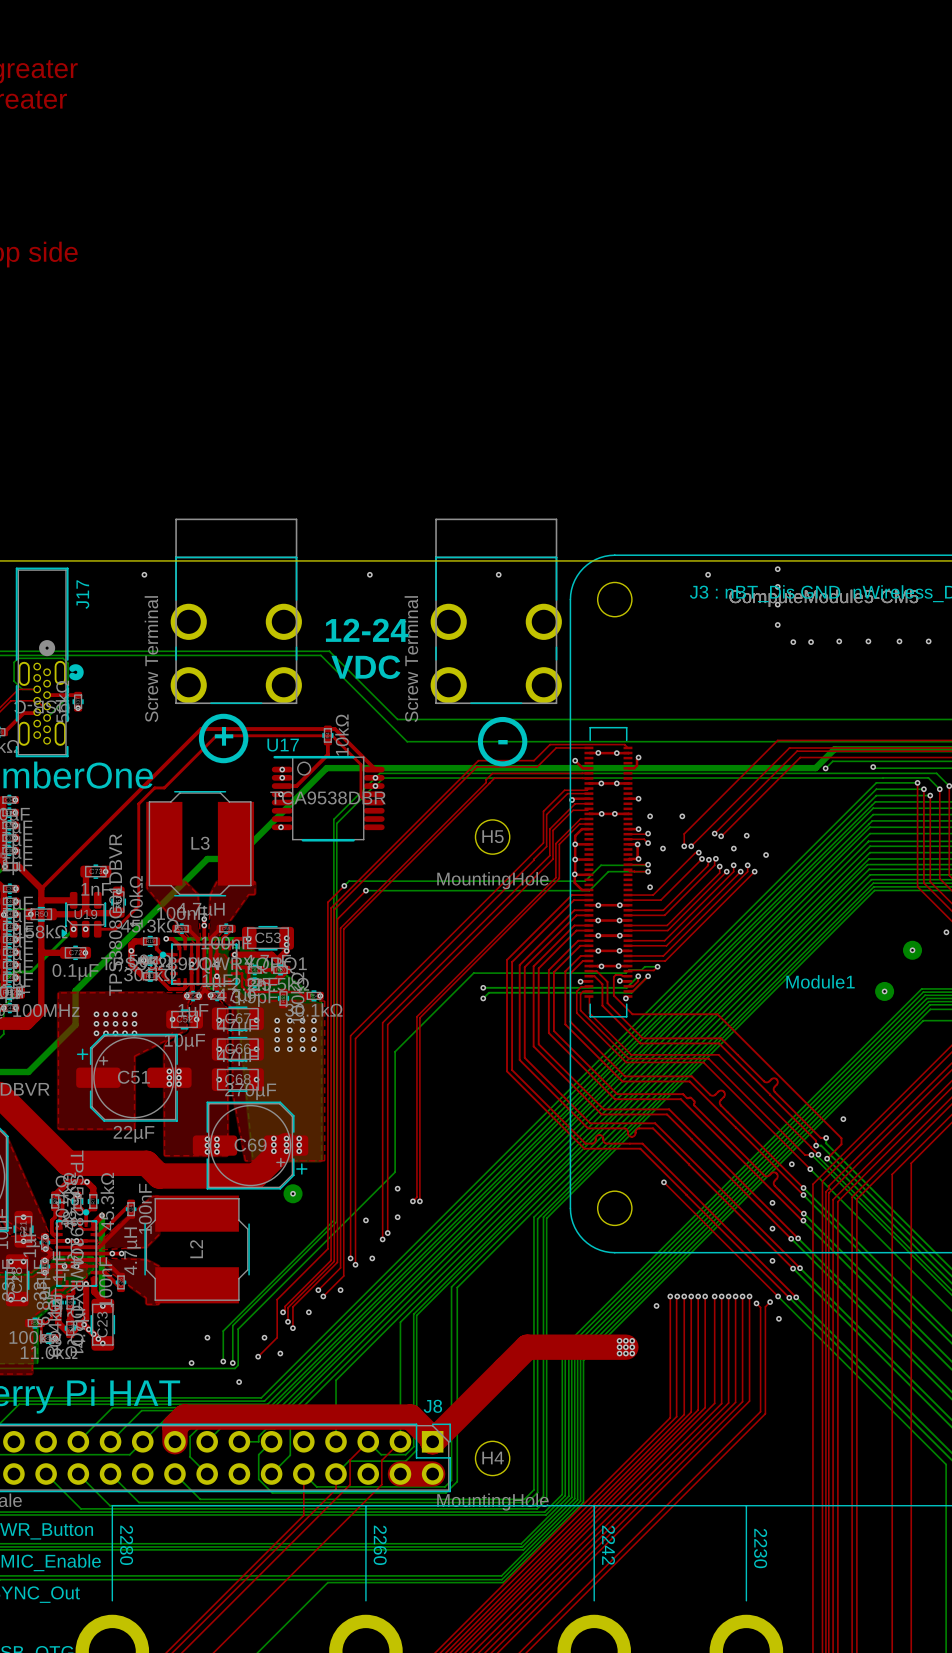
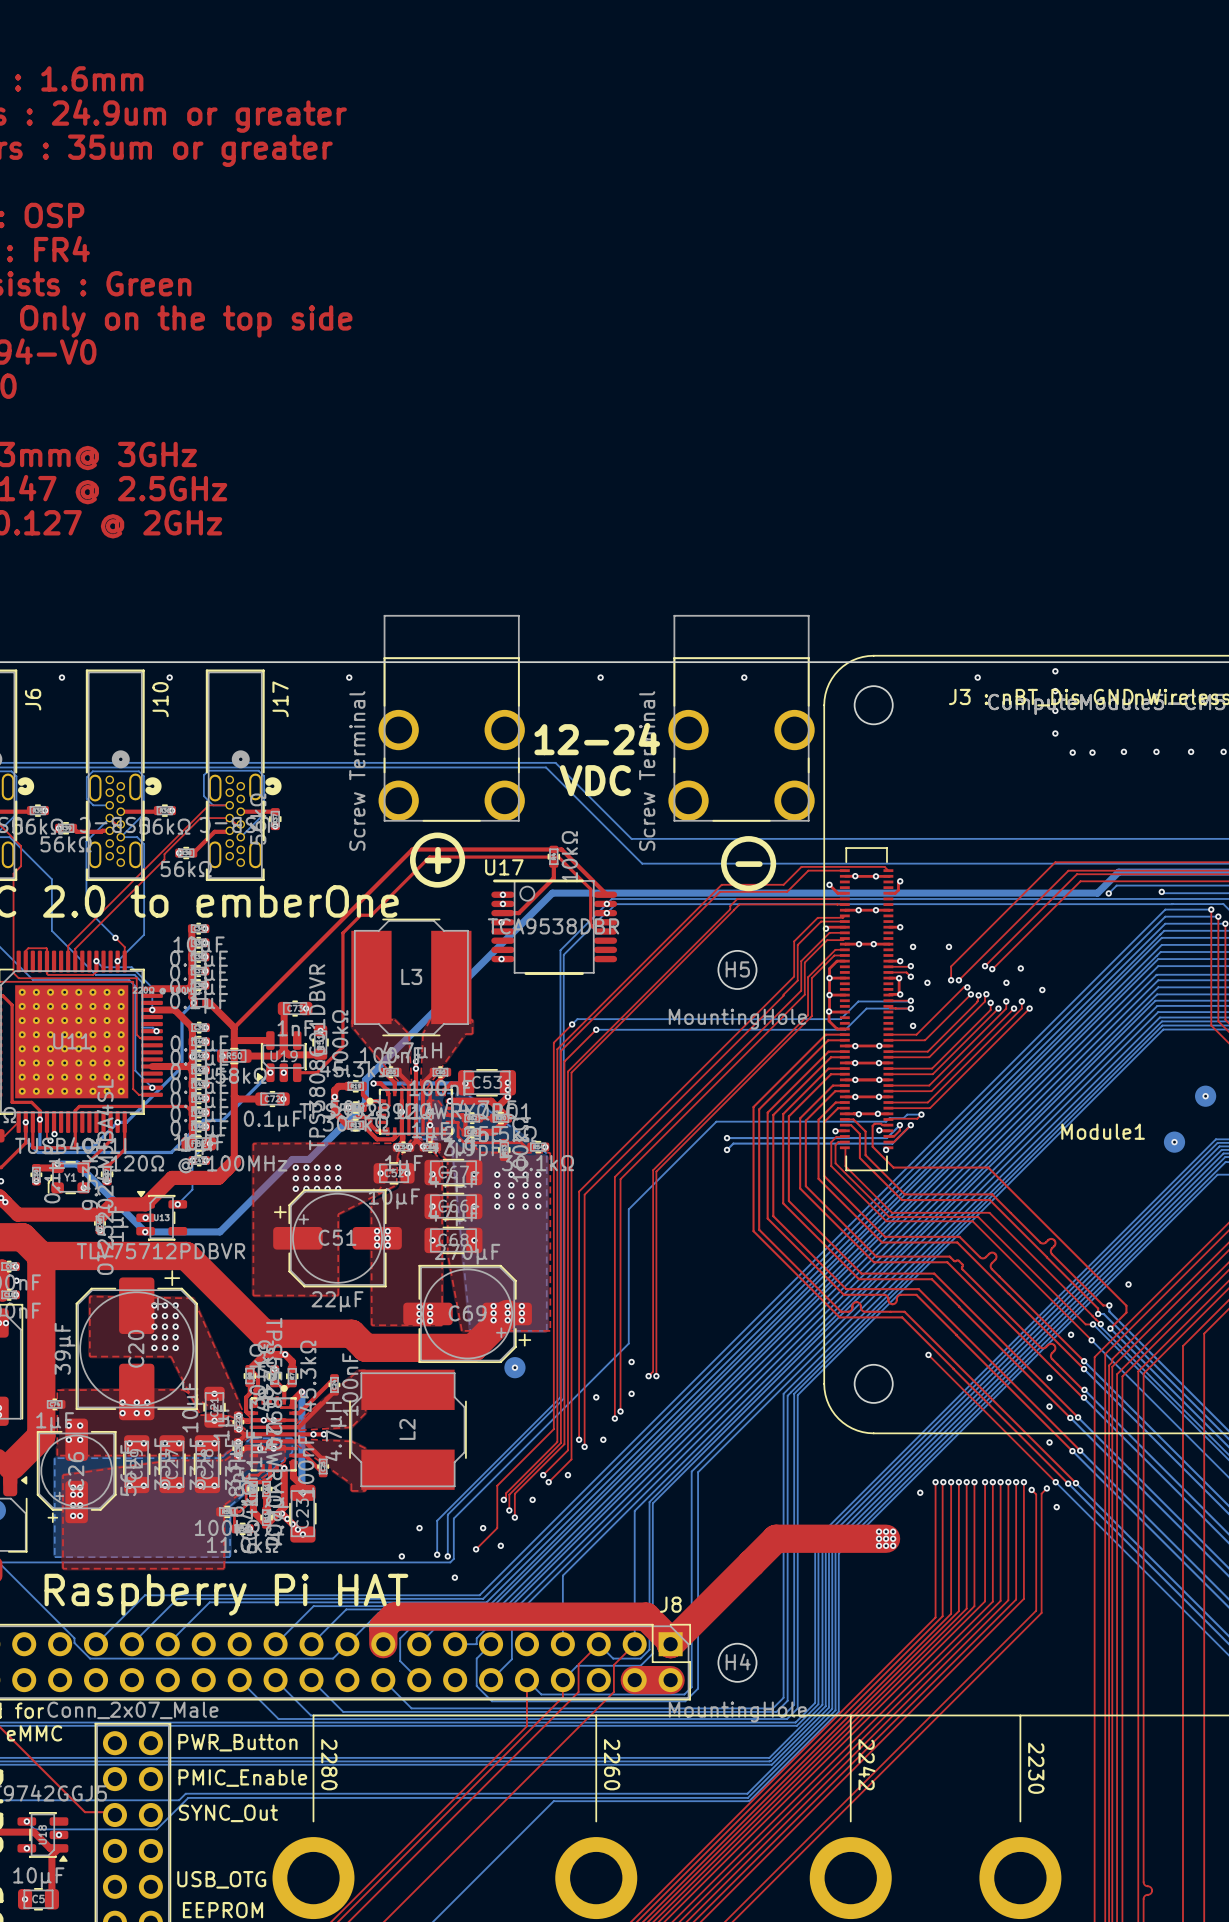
bottom track: (235, 858) (207, 858) (75, 990) (75, 1024) -> (451, 994) (365, 1080) (365, 1103) (309, 1159) (292, 1159) (272, 1179)

